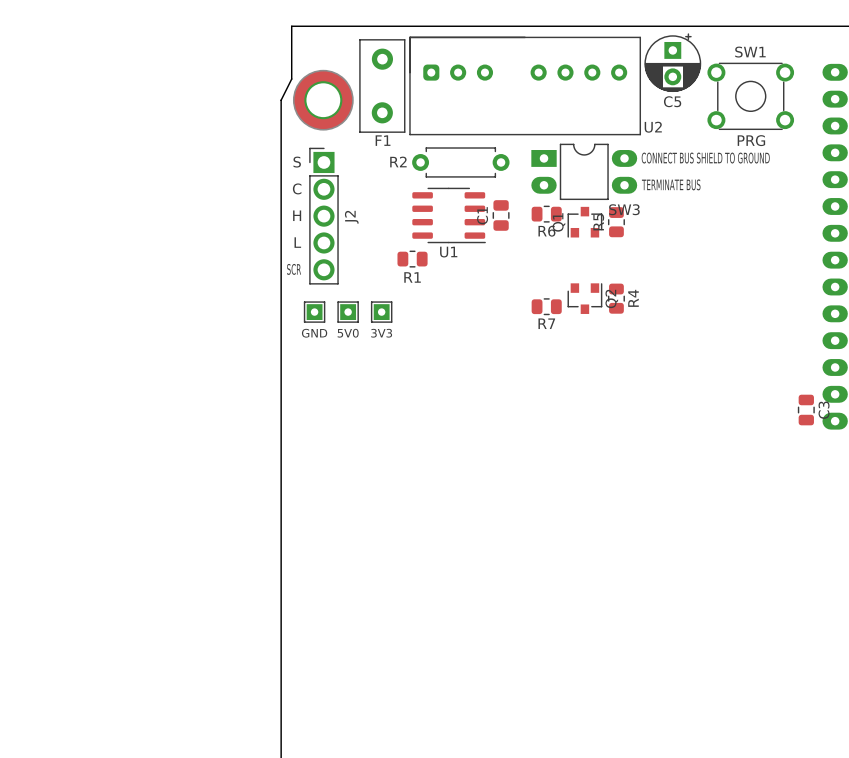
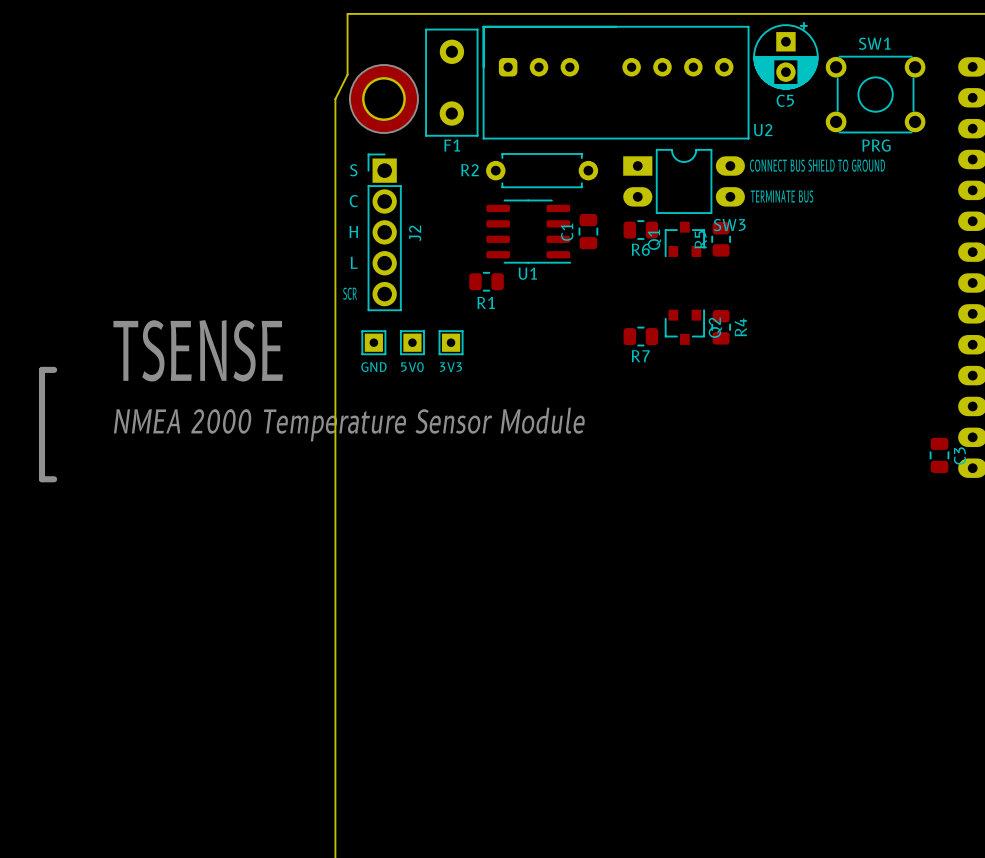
text: none -> TSENSE (198, 350)
line: none -> (54, 369) (41, 369) (41, 479) (54, 479)
text: none -> NMEA 2000 Temperature Sensor Module (349, 424)

